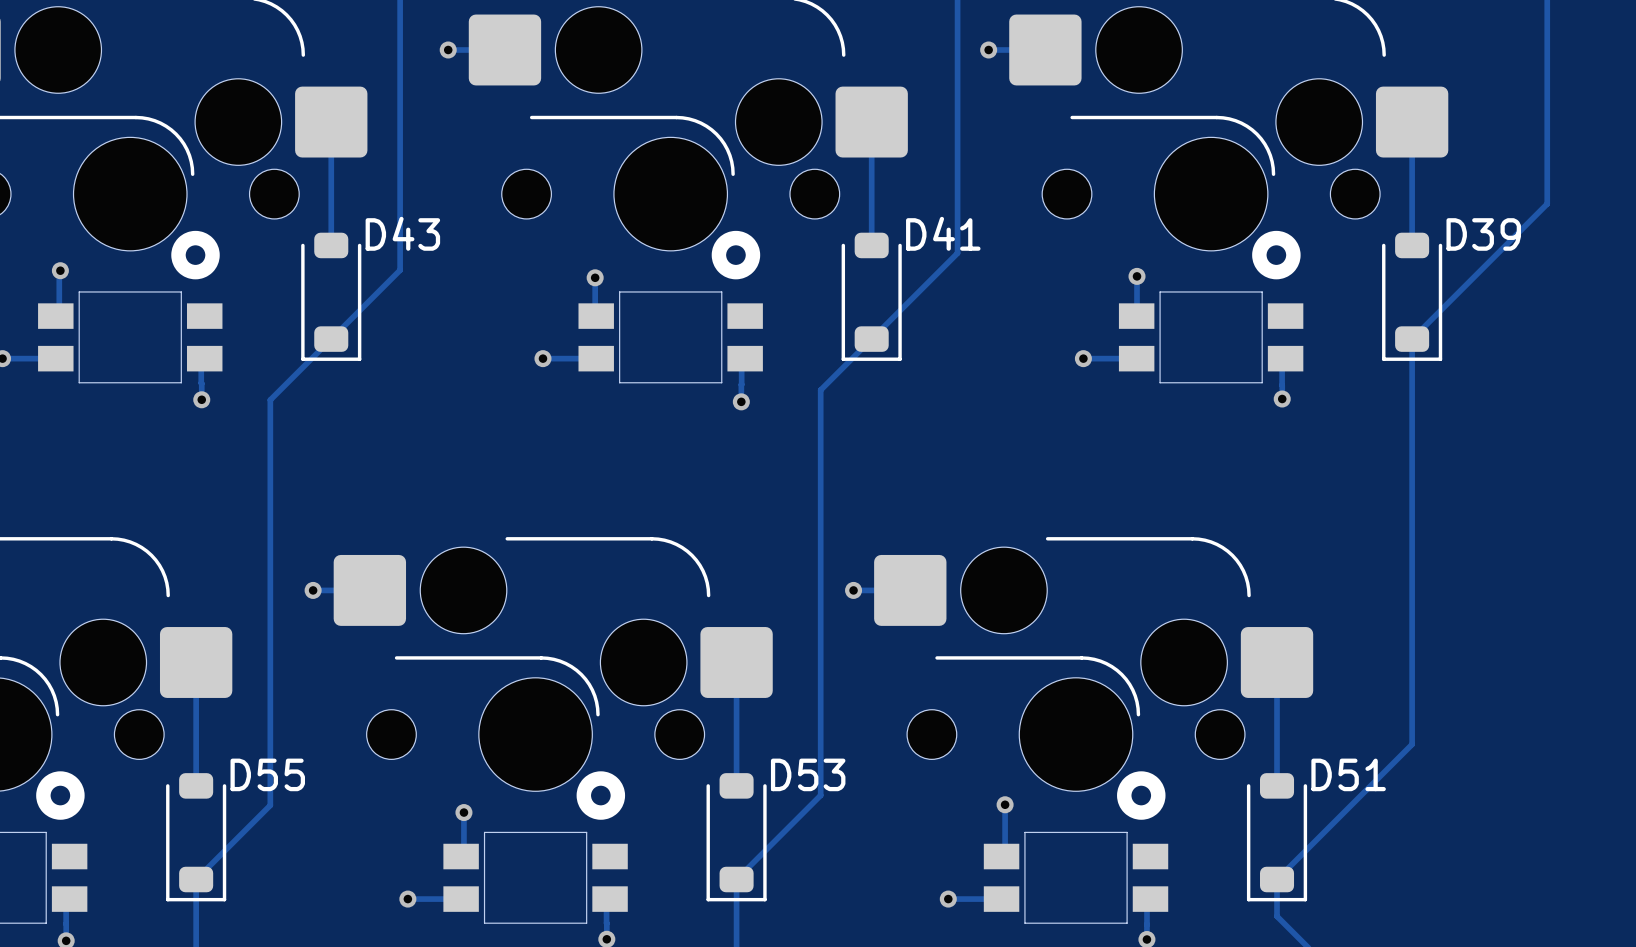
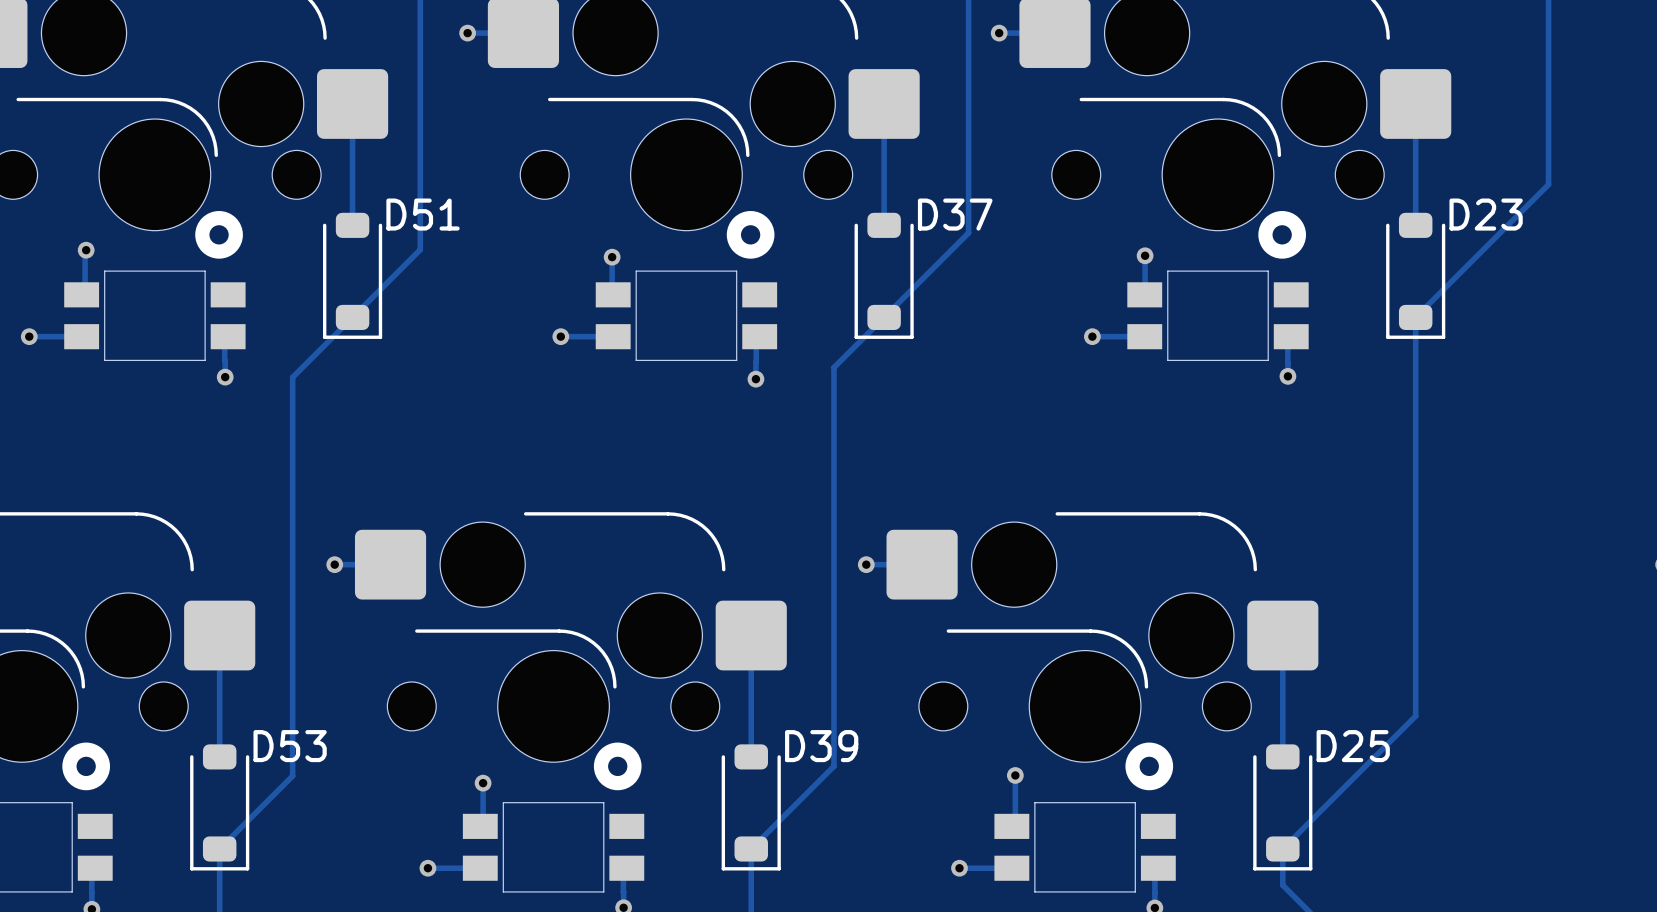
D43 name: D43 (402, 233) -> D51 (423, 214)
D41 name: D41 (943, 233) -> D37 (955, 214)
D39 name: D39 (1483, 234) -> D23 (1486, 214)
D55 name: D55 (267, 774) -> D53 (290, 746)
D53 name: D53 (808, 774) -> D39 (821, 746)
D51 name: D51 (1348, 774) -> D25 (1353, 746)

